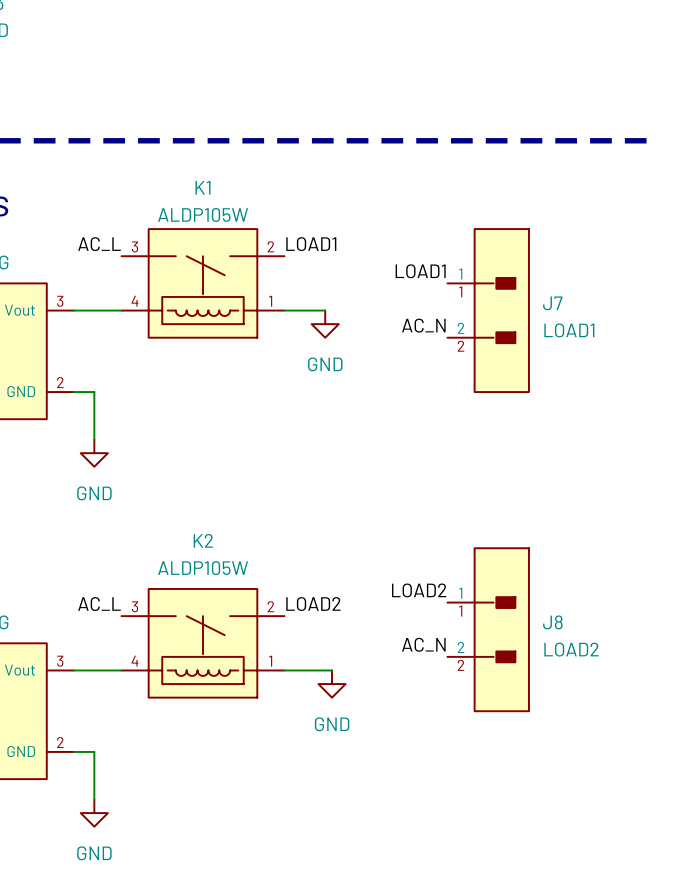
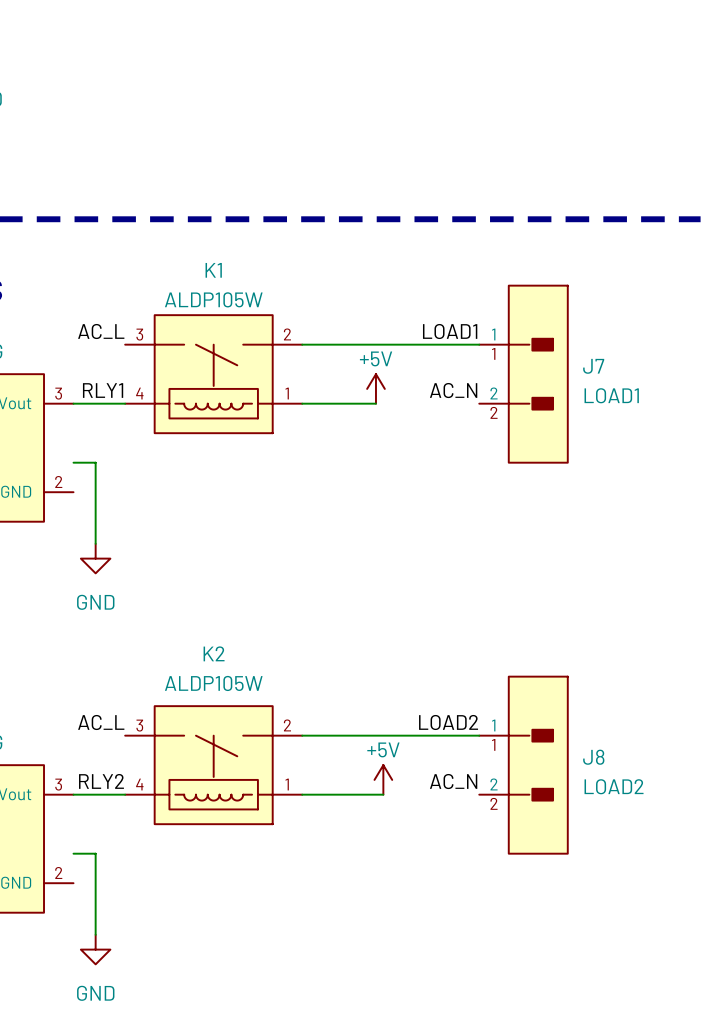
label: LOAD1 (311, 244) -> none
wire: none -> (302, 344) (479, 344)
label position: LOAD1 (420, 271) -> LOAD1 (450, 331)
power symbol: none -> +5V (375, 388)
label: none -> RLY1 (103, 390)
wire: none -> (346, 403) (375, 403)
J7 position: (488, 310) -> (523, 374)
power symbol: GND (325, 324) -> none
label position: AC_N (423, 325) -> AC_N (453, 390)
wire: (73, 392) (94, 392) -> (73, 462) (95, 462) (95, 492)
label position: LOAD2 (419, 590) -> LOAD2 (448, 722)
label: LOAD2 (313, 604) -> none
wire: none -> (302, 735) (479, 735)
J8 position: (488, 629) -> (523, 765)
label position: AC_N (423, 644) -> AC_N (453, 781)
power symbol: none -> +5V (383, 779)
label: none -> RLY2 (101, 781)
wire: none -> (353, 794) (383, 794)
power symbol: GND (332, 684) -> none
wire: (73, 751) (94, 751) -> (73, 853) (95, 853) (95, 883)

